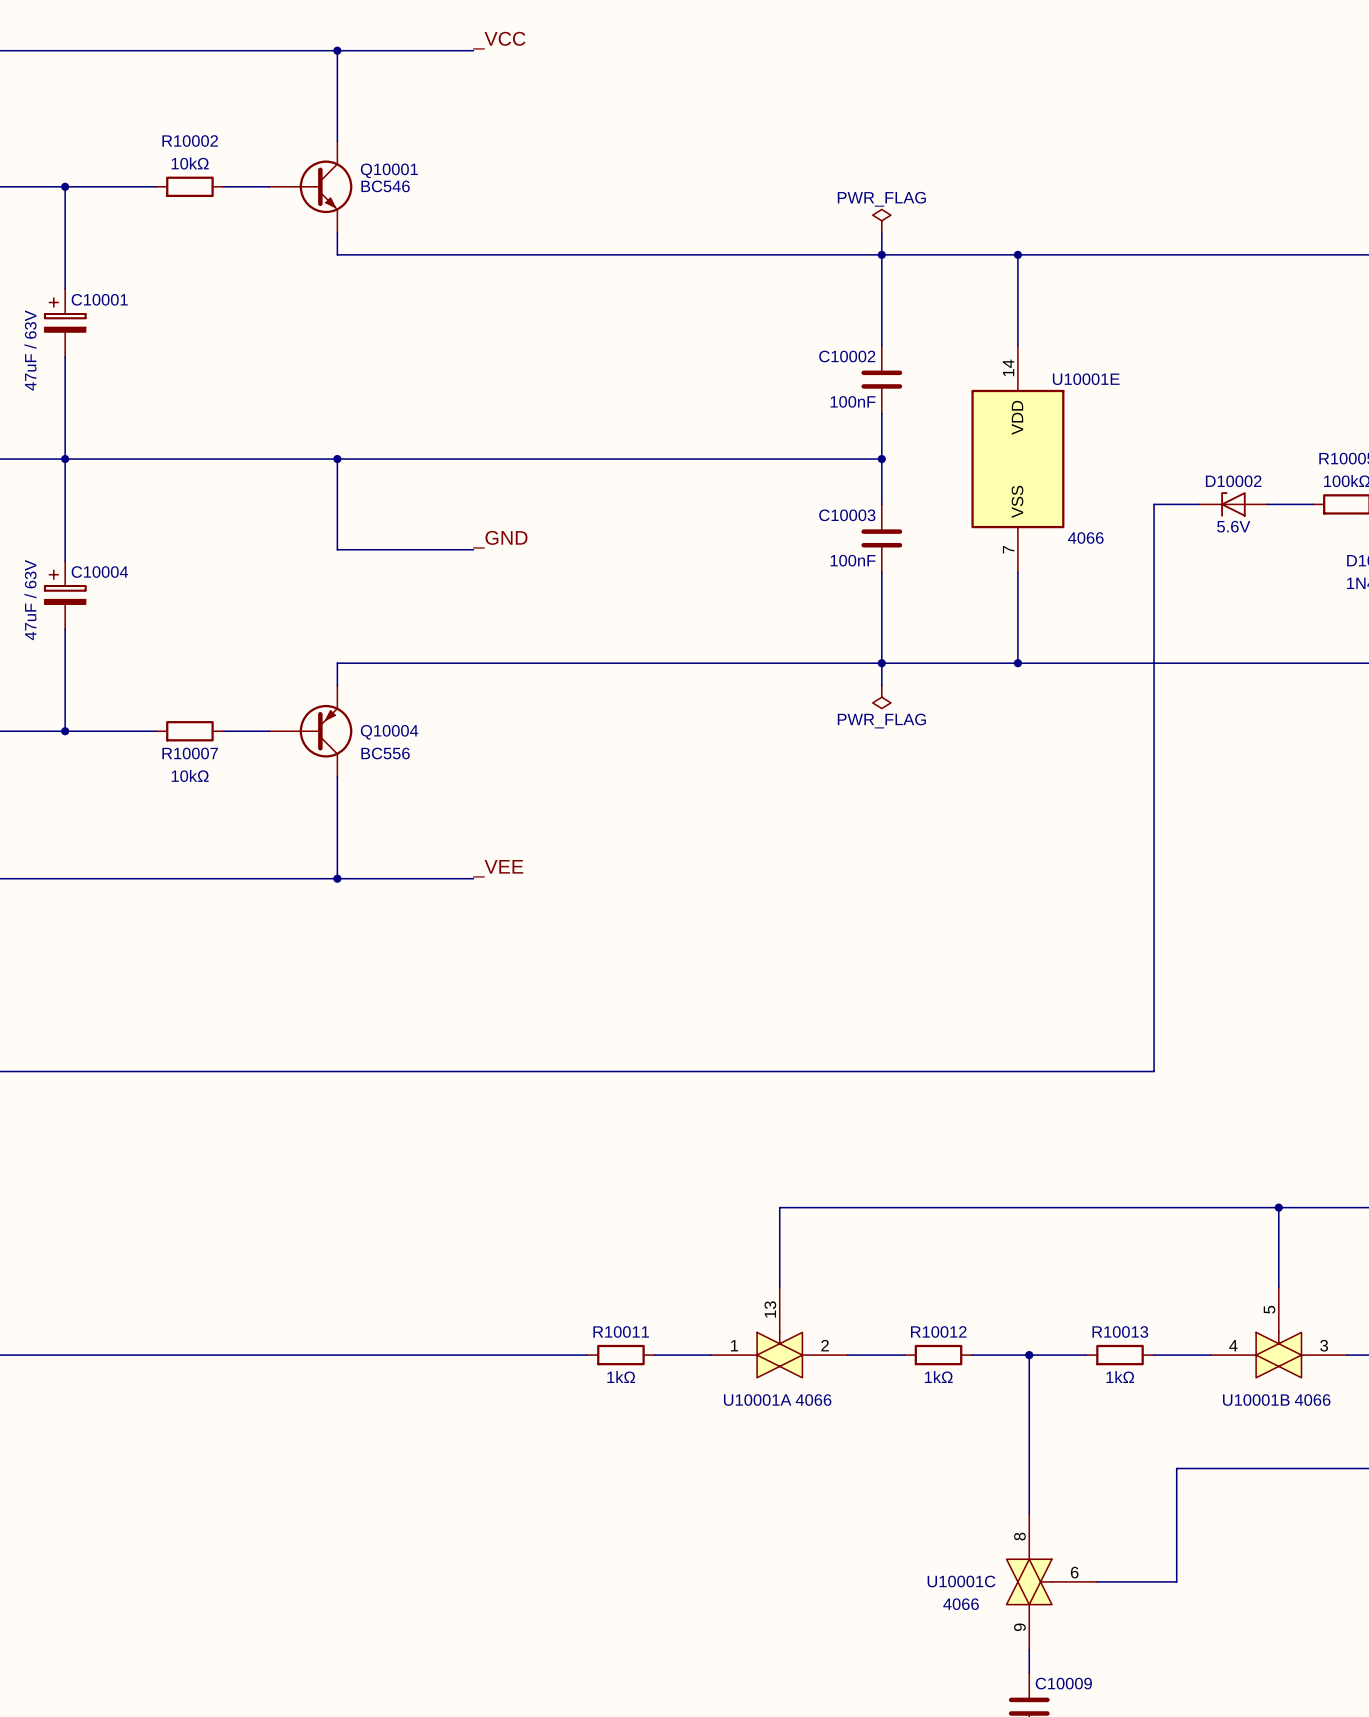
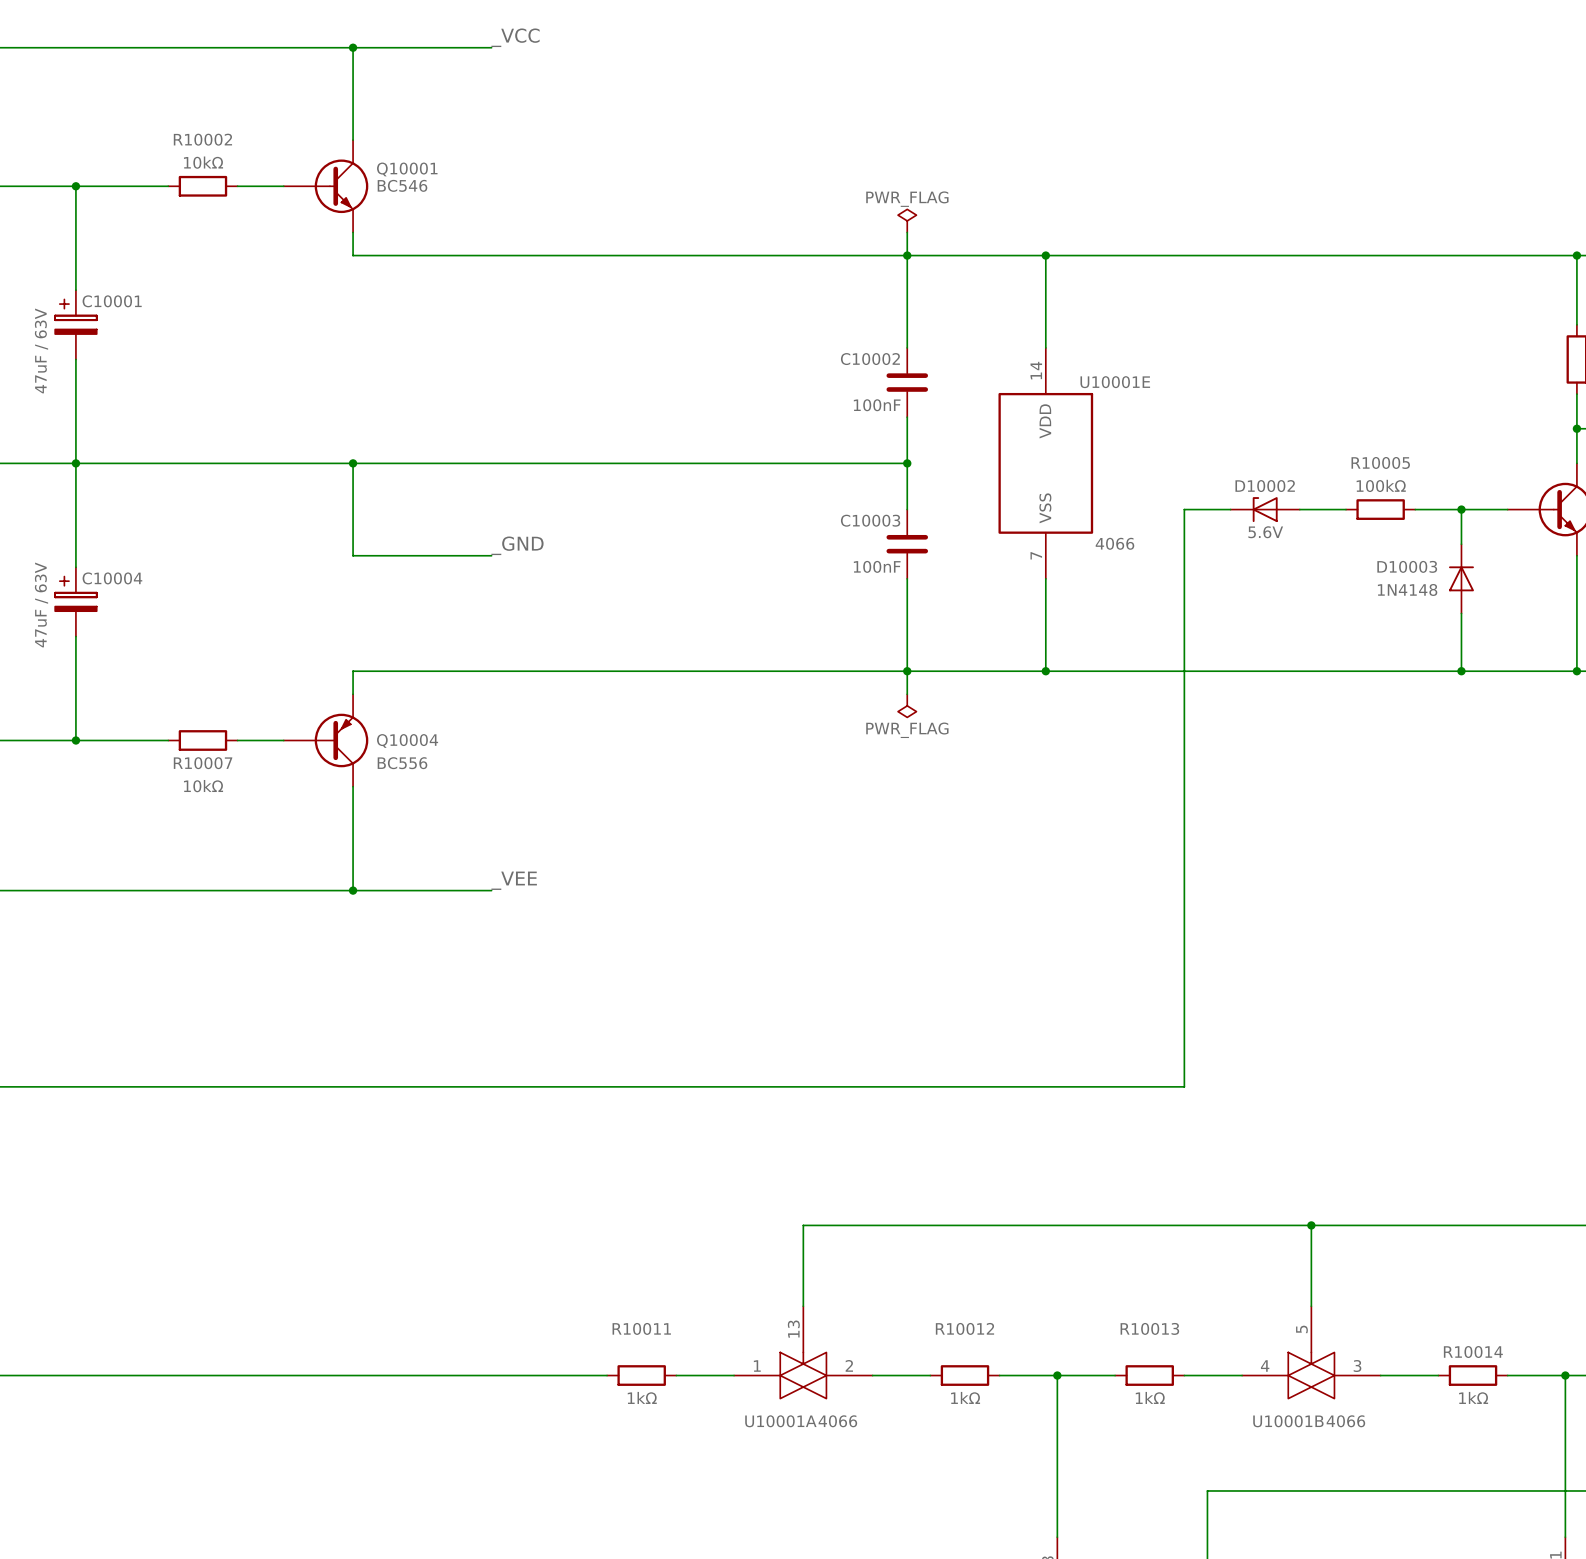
R10011 name position: R10011 (621, 1331) -> R10011 (641, 1328)
R10012 name position: R10012 (938, 1331) -> R10012 (964, 1328)
R10013 name position: R10013 (1120, 1331) -> R10013 (1149, 1328)

